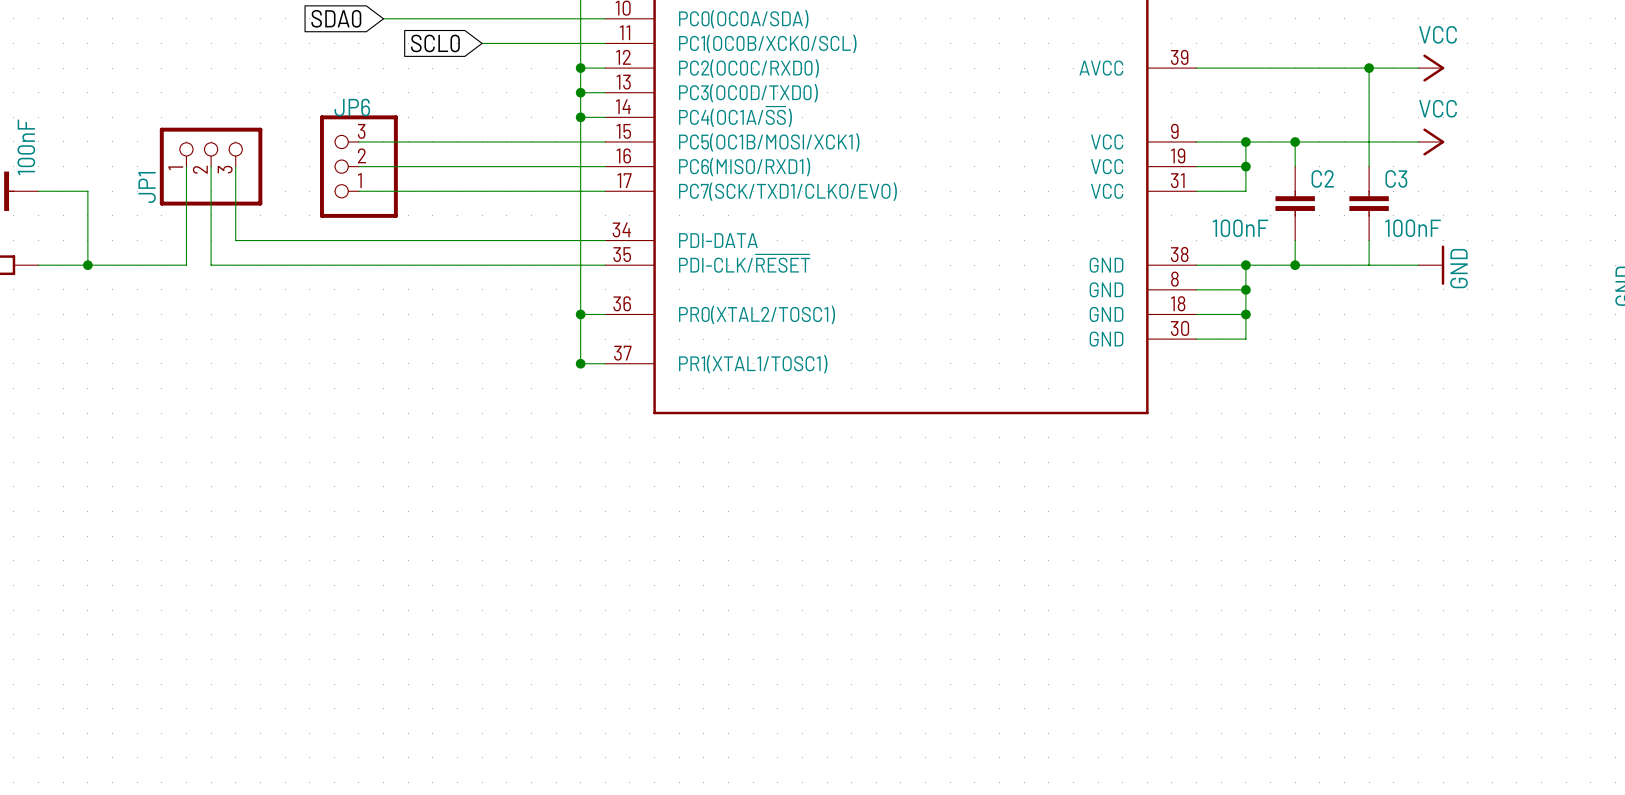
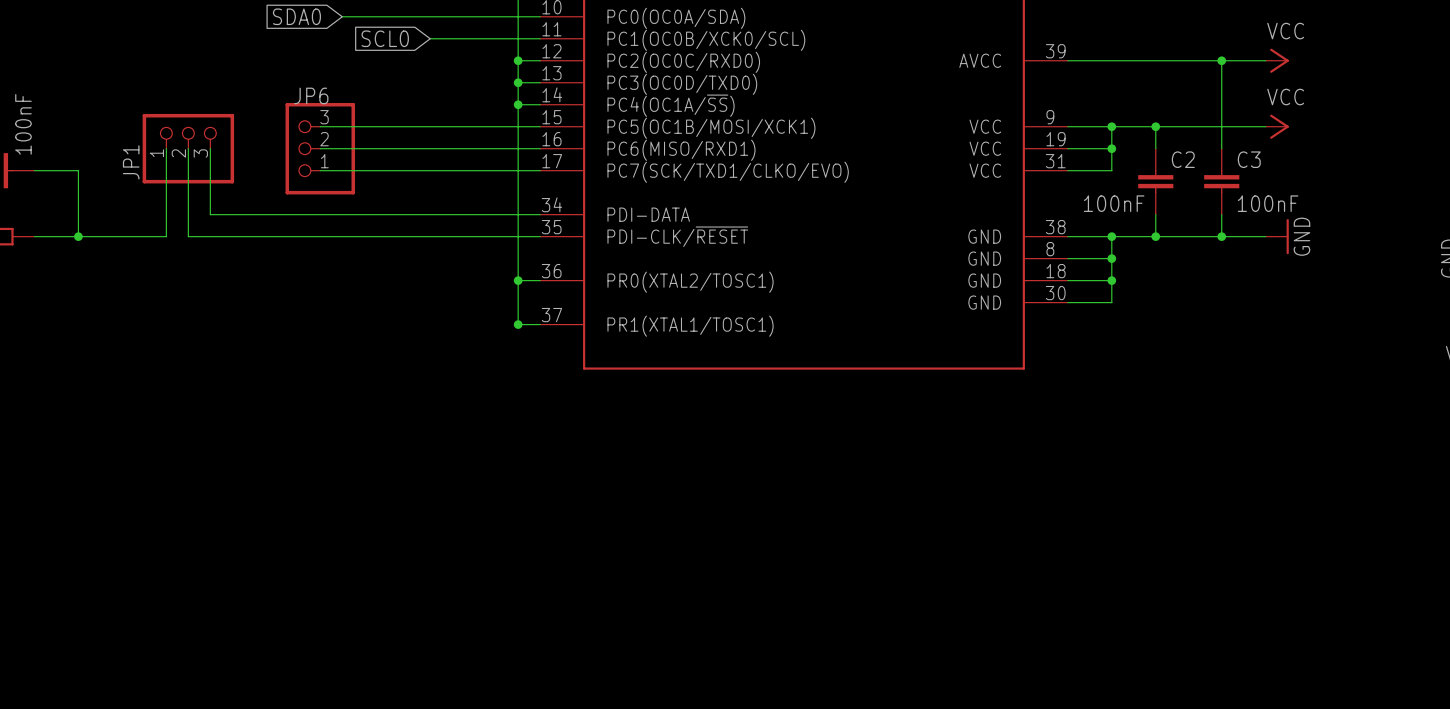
junction: none -> (1221, 236)

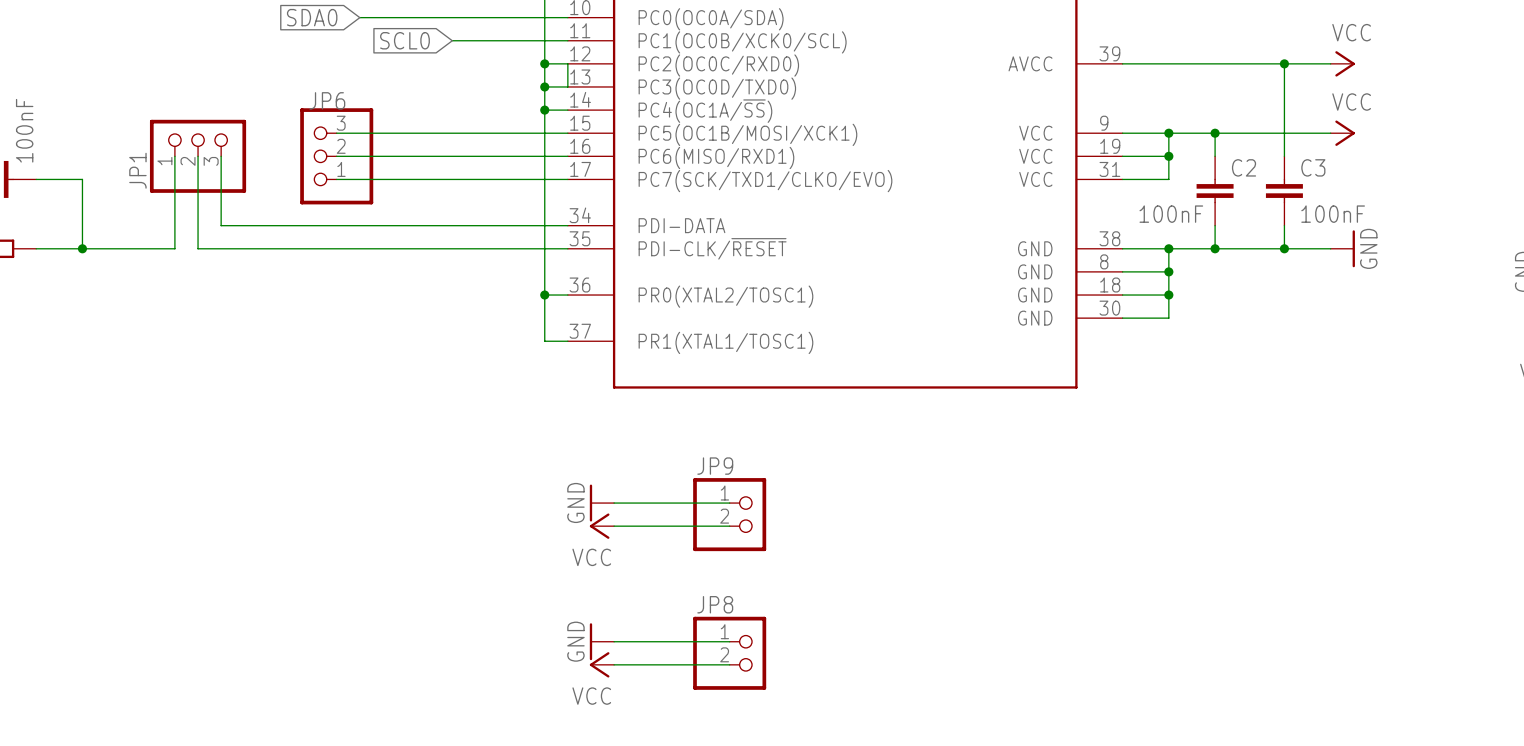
wire: none -> (567, 63) (567, 86)
junction: (518, 324) -> none
power symbol: none -> GND (601, 503)
wire: none -> (614, 503) (729, 503)
JP9: none -> (729, 514)
power symbol: none -> VCC (601, 526)
wire: none -> (614, 526) (729, 526)
power symbol: none -> GND (601, 641)
wire: none -> (614, 641) (729, 641)
JP8: none -> (729, 653)
power symbol: none -> VCC (601, 664)
wire: none -> (614, 664) (729, 664)

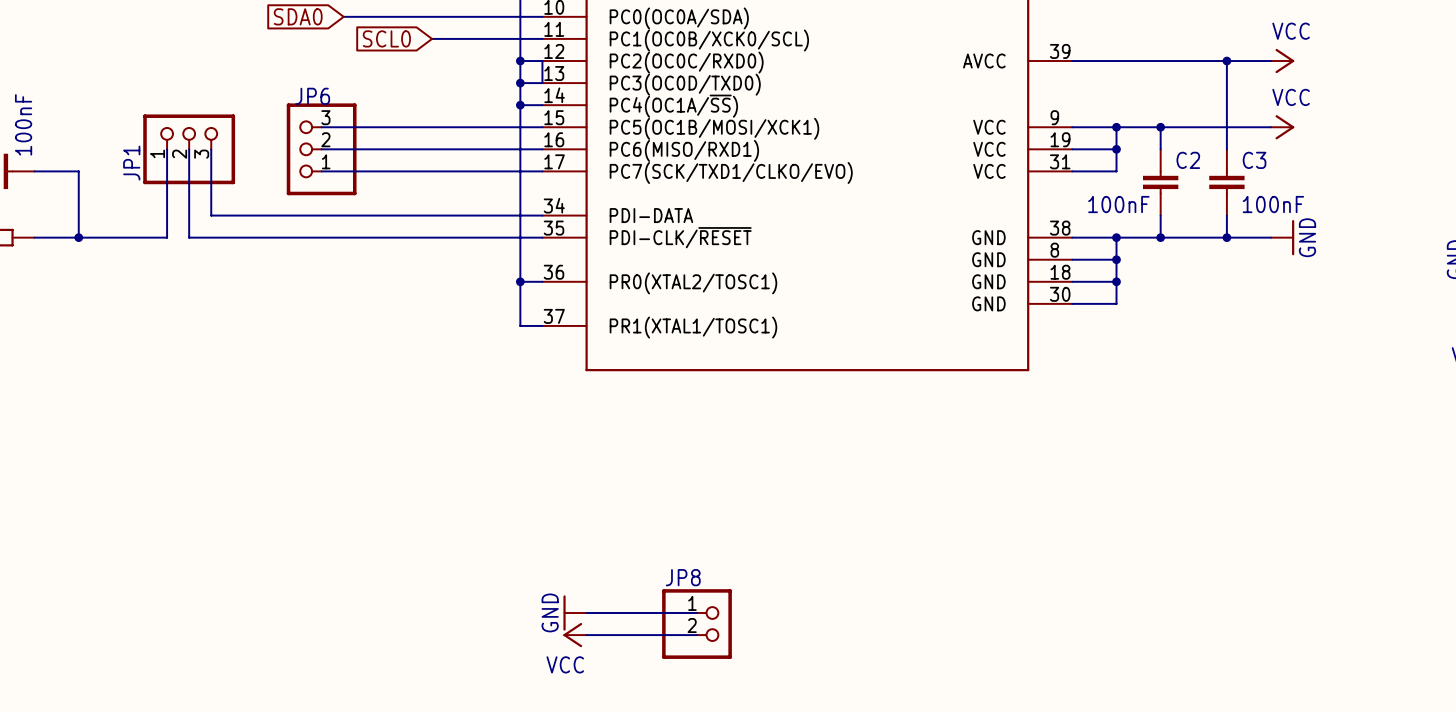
power symbol: GND (601, 503) -> none
wire: (614, 503) (729, 503) -> none
JP9: (729, 514) -> none
power symbol: VCC (601, 526) -> none
wire: (614, 526) (729, 526) -> none

